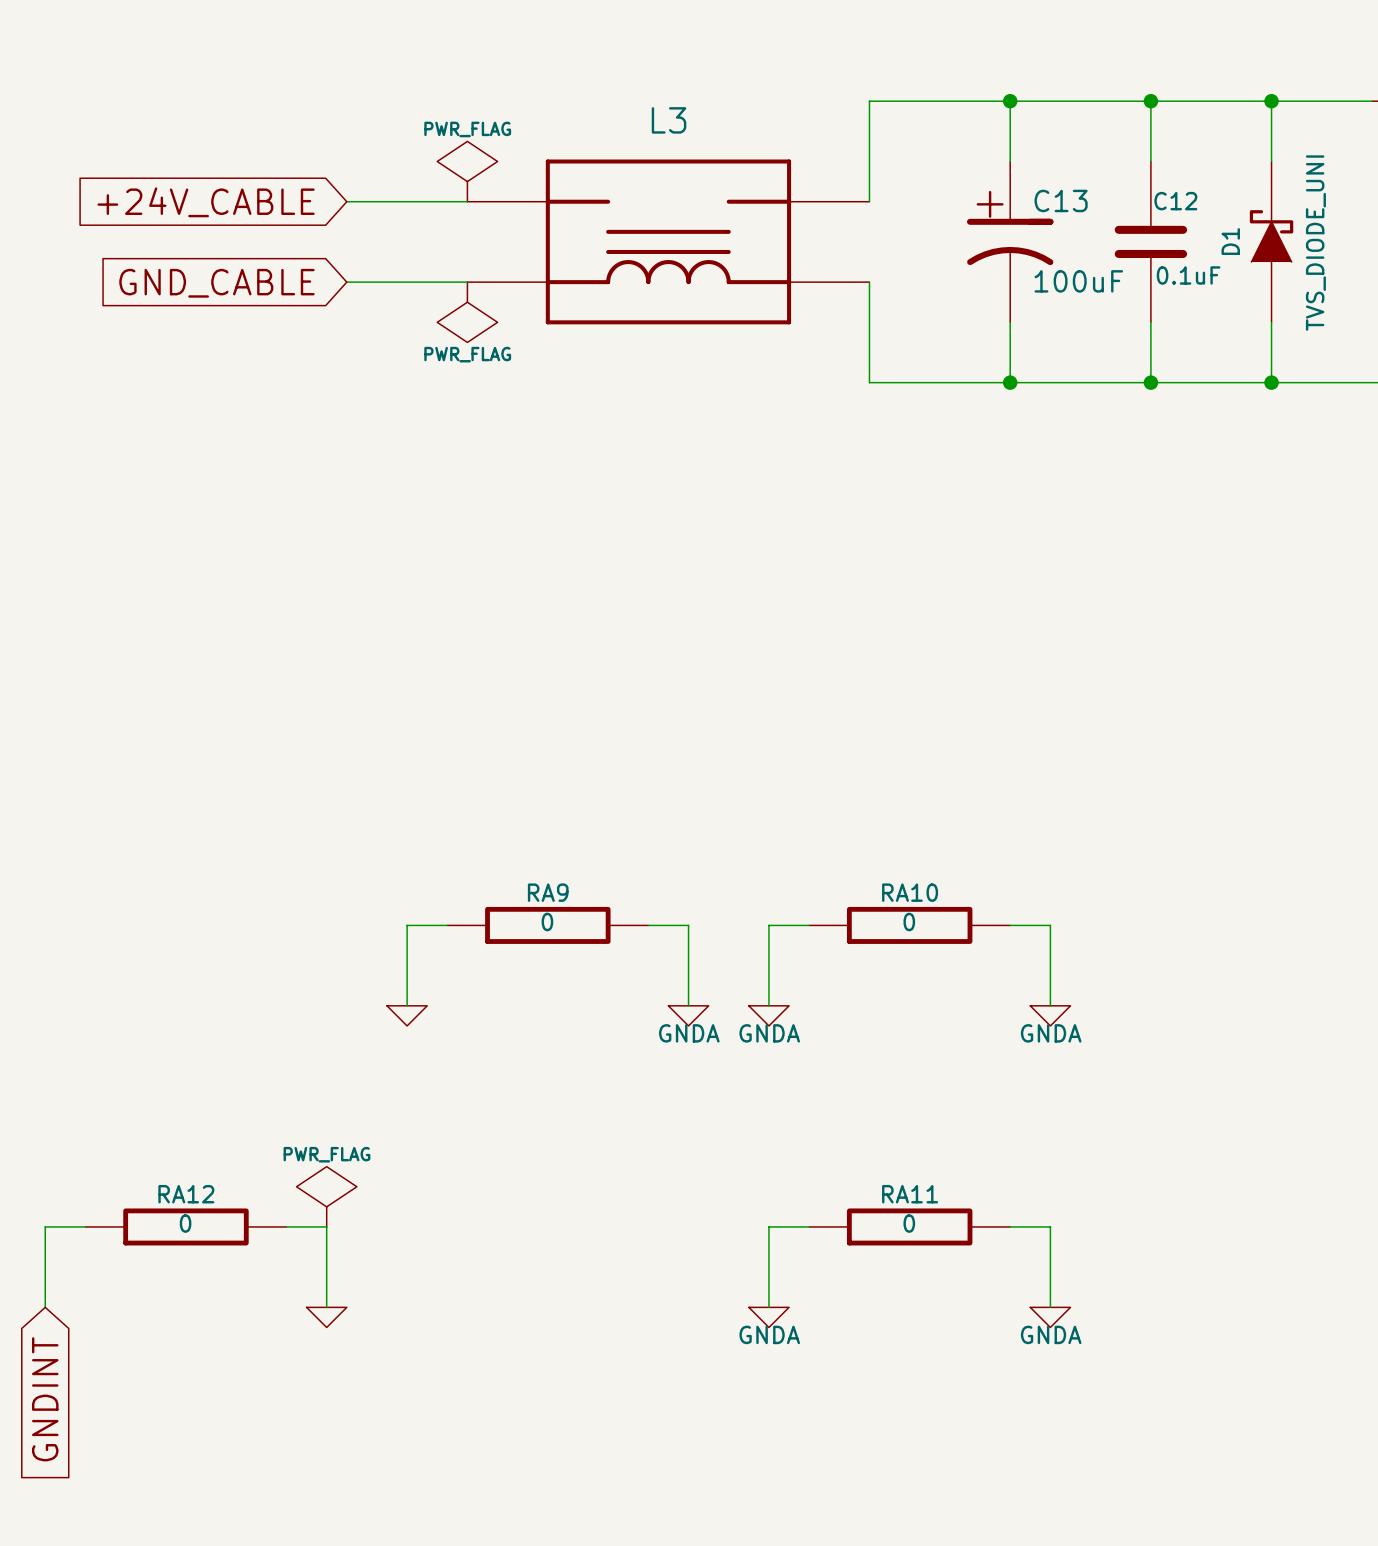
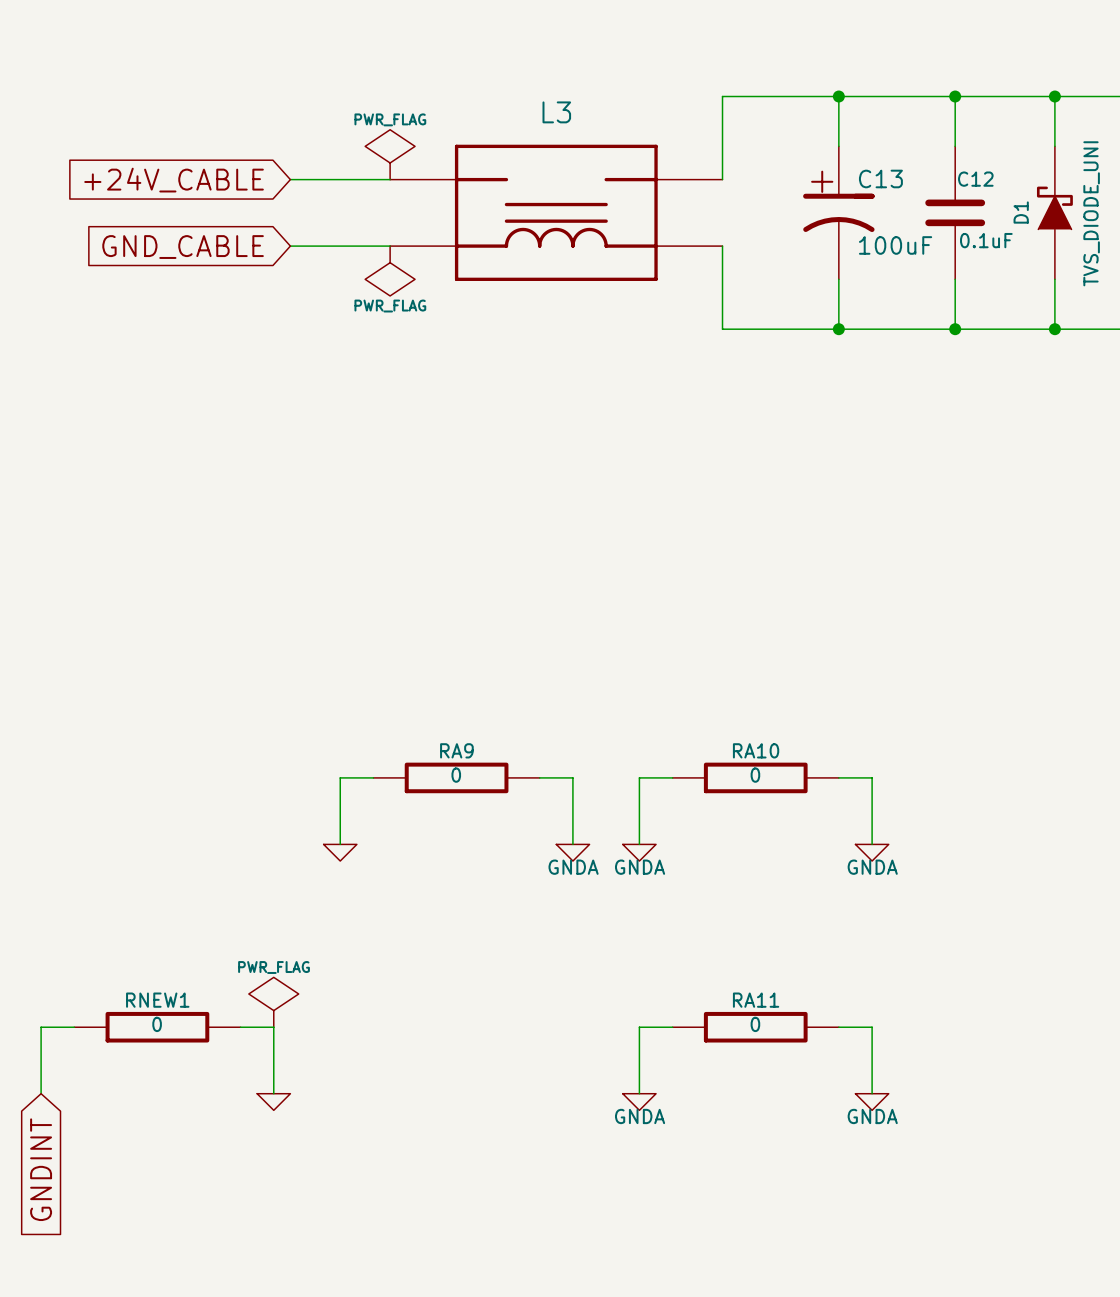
RA12 name: RA12 (186, 1194) -> RNEW1 (157, 1000)

